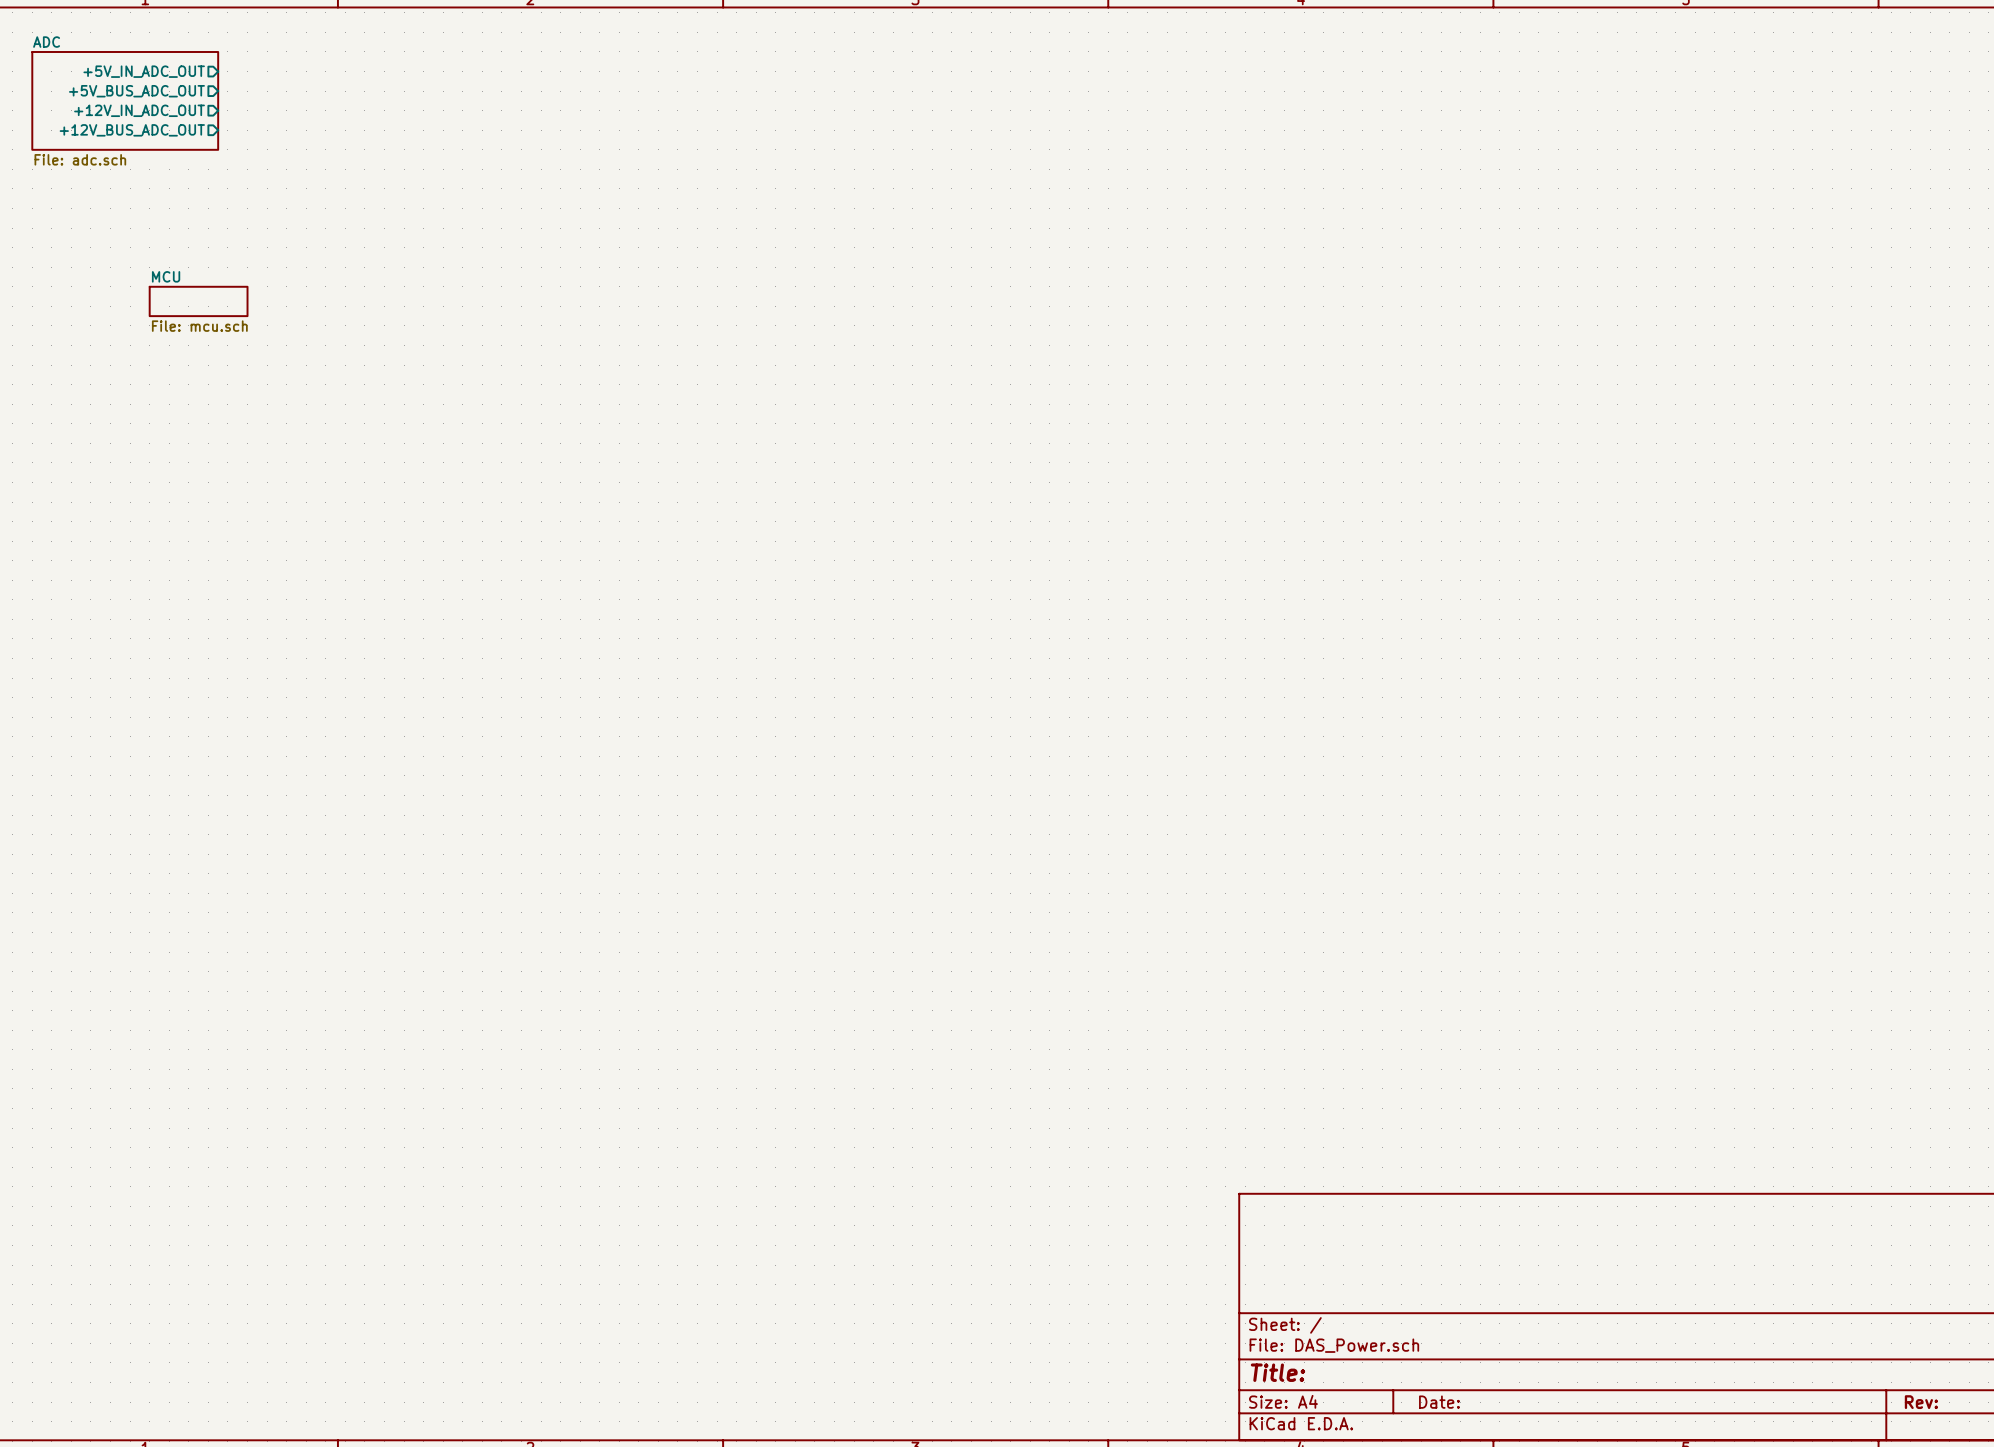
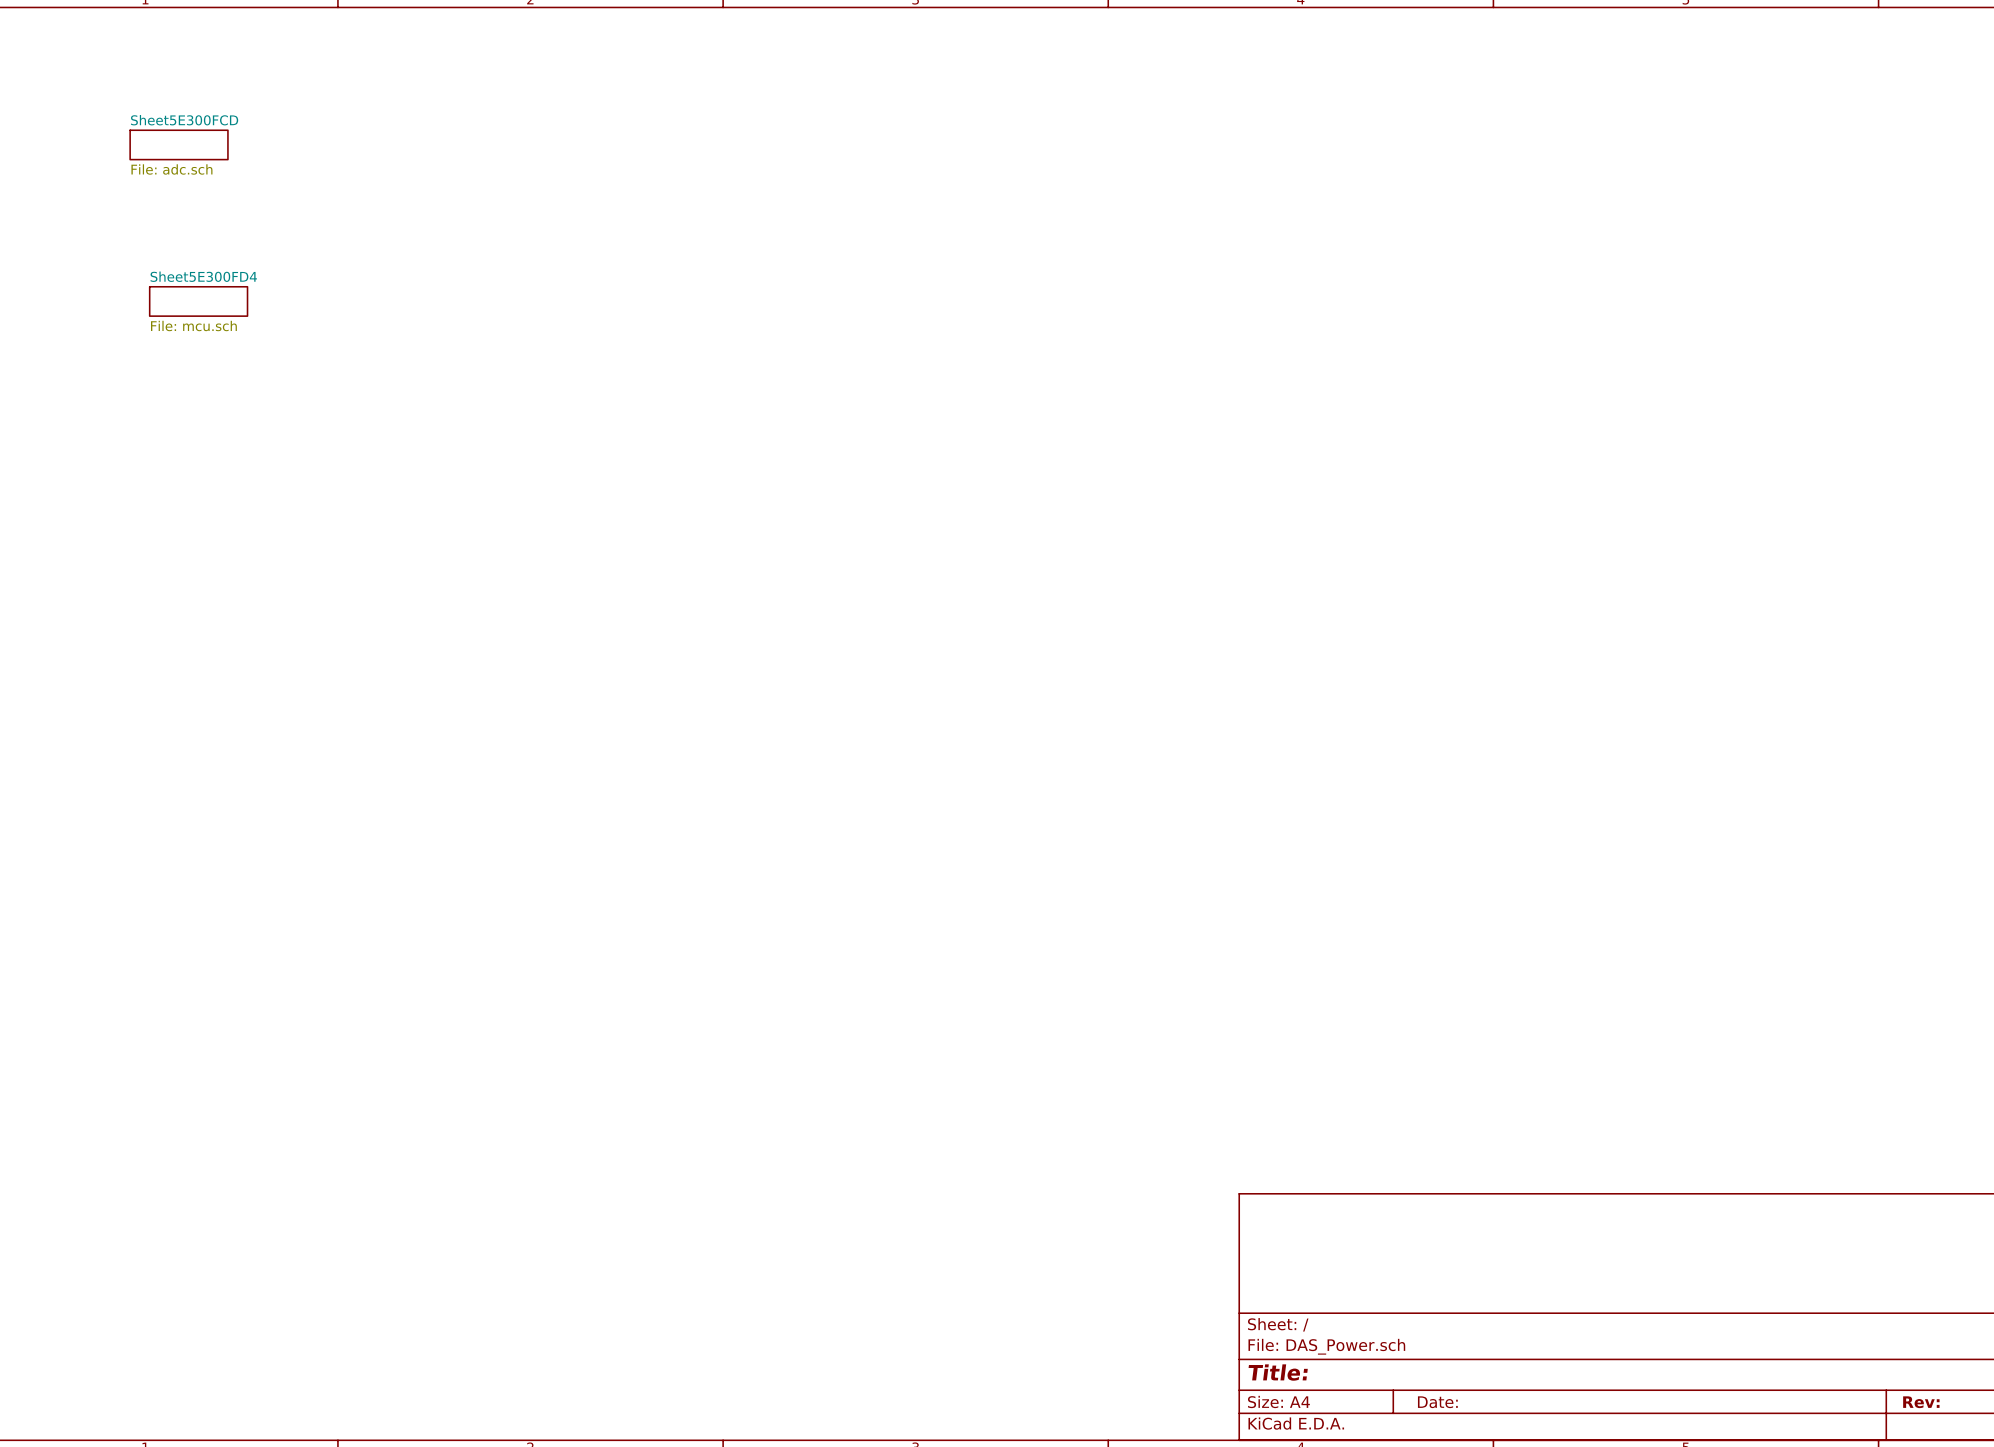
sheet pin: +5V_IN_ADC_OUT (144, 71) -> none
sheet pin: +5V_BUS_ADC_OUT (136, 91) -> none
sheet ADC: File: adc.sch (125, 100) -> none
sheet pin: +12V_IN_ADC_OUT (139, 110) -> none
sheet pin: +12V_BUS_ADC_OUT (132, 130) -> none
sheet Sheet5E300FCD: none -> File: adc.sch (179, 144)
sheet MCU name: MCU (166, 276) -> Sheet5E300FD4 (203, 276)

